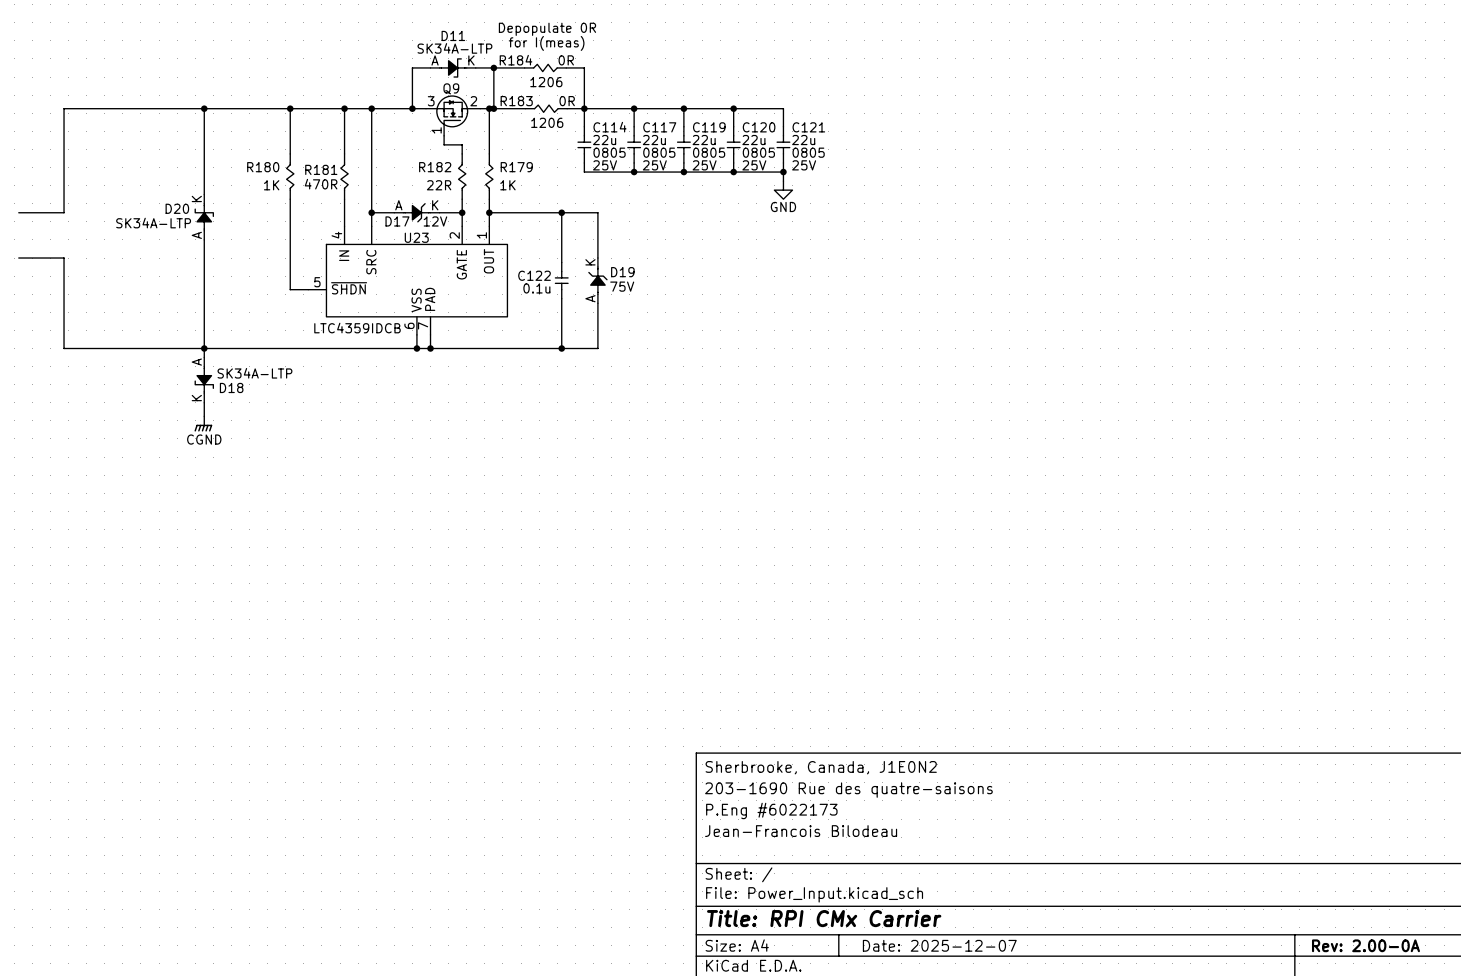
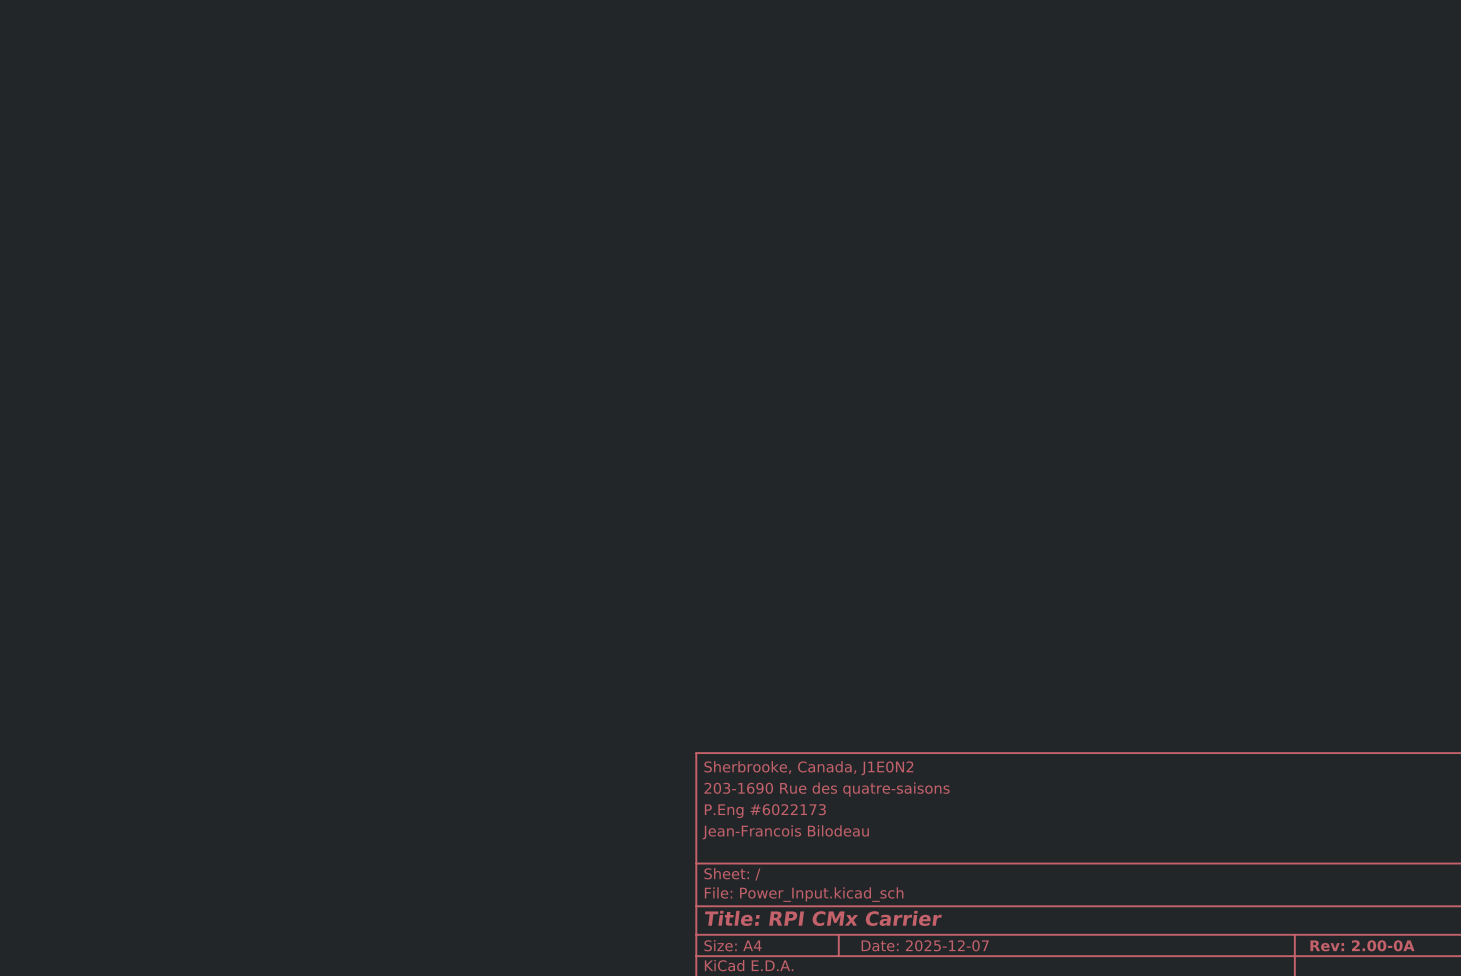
text: Depopulate 0R (547, 29) -> none
text: for I(meas) (546, 43) -> none
wire: (430, 67) (412, 67) (412, 108) -> none
D11: SK34A-LTP (453, 67) -> none
wire: (475, 67) (524, 67) -> none
wire: (493, 67) (493, 108) -> none
junction: (493, 67) -> none
R184: 0R (545, 67) -> none
wire: (566, 67) (584, 67) (584, 126) -> none
wire: (204, 108) (204, 194) -> none
junction: (204, 108) -> none
wire: (290, 108) (290, 153) -> none
junction: (290, 108) -> none
wire: (344, 108) (344, 153) -> none
junction: (344, 108) -> none
wire: (371, 108) (371, 226) -> none
junction: (371, 108) -> none
junction: (412, 108) -> none
wire: (425, 108) (64, 108) (64, 212) (18, 212) -> none
wire: (480, 108) (525, 108) -> none
wire: (489, 108) (489, 153) -> none
junction: (489, 108) -> none
junction: (493, 108) -> none
R183: 0R (546, 108) -> none
wire: (567, 108) (783, 108) (783, 126) -> none
junction: (584, 108) -> none
wire: (634, 108) (634, 126) -> none
junction: (634, 108) -> none
wire: (683, 108) (683, 126) -> none
junction: (683, 108) -> none
wire: (733, 108) (733, 126) -> none
junction: (733, 108) -> none
Q9: (453, 115) -> none
wire: (444, 135) (444, 144) (462, 144) (462, 153) -> none
C114: 22u (584, 144) -> none
C117: 22u (634, 144) -> none
C119: 22u (683, 144) -> none
C120: 22u (733, 144) -> none
C121: 22u (783, 144) -> none
wire: (584, 162) (584, 172) (783, 172) -> none
wire: (634, 162) (634, 172) -> none
wire: (683, 162) (683, 172) -> none
wire: (733, 162) (733, 172) -> none
wire: (783, 162) (783, 181) -> none
junction: (634, 172) -> none
junction: (683, 172) -> none
junction: (733, 172) -> none
junction: (783, 172) -> none
R180: 1K (290, 176) -> none
R181: 470R (344, 176) -> none
R182: 22R (462, 176) -> none
R179: 1K (489, 176) -> none
power symbol: GND (783, 190) -> none
wire: (290, 199) (290, 289) (308, 289) -> none
wire: (344, 199) (344, 226) -> none
wire: (462, 199) (462, 226) -> none
wire: (489, 199) (489, 226) -> none
wire: (371, 212) (394, 212) -> none
junction: (371, 212) -> none
D17: (416, 212) -> none
wire: (439, 212) (462, 212) -> none
junction: (462, 212) -> none
wire: (489, 212) (597, 212) (597, 258) -> none
junction: (489, 212) -> none
wire: (561, 212) (561, 262) -> none
junction: (561, 212) -> none
D20: SK34A-LTP (204, 217) -> none
wire: (204, 239) (204, 357) -> none
wire: (18, 258) (64, 258) (64, 348) (597, 348) (597, 303) -> none
U23: LTC4359IDCB (407, 280) -> none
C122: 0.1u (561, 280) -> none
D19: (597, 280) -> none
wire: (561, 298) (561, 348) -> none
wire: (416, 334) (416, 348) -> none
wire: (430, 334) (430, 348) -> none
junction: (204, 348) -> none
junction: (416, 348) -> none
junction: (430, 348) -> none
junction: (561, 348) -> none
D18: SK34A-LTP (204, 380) -> none
wire: (204, 402) (204, 416) -> none
power symbol: CGND (203, 423) -> none

